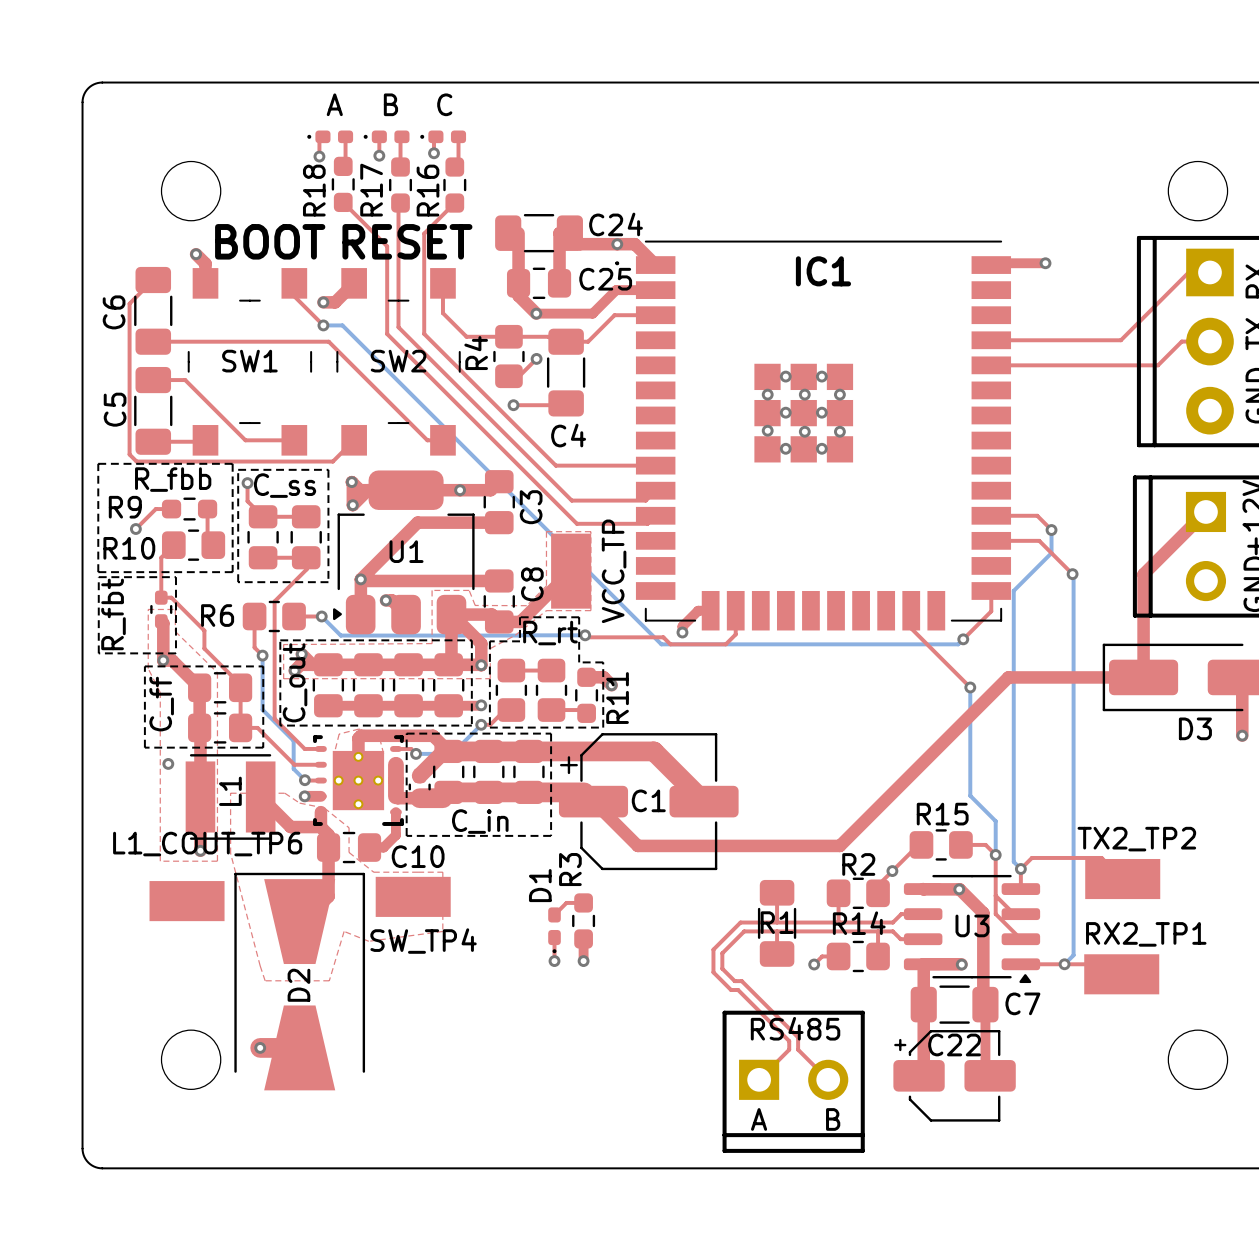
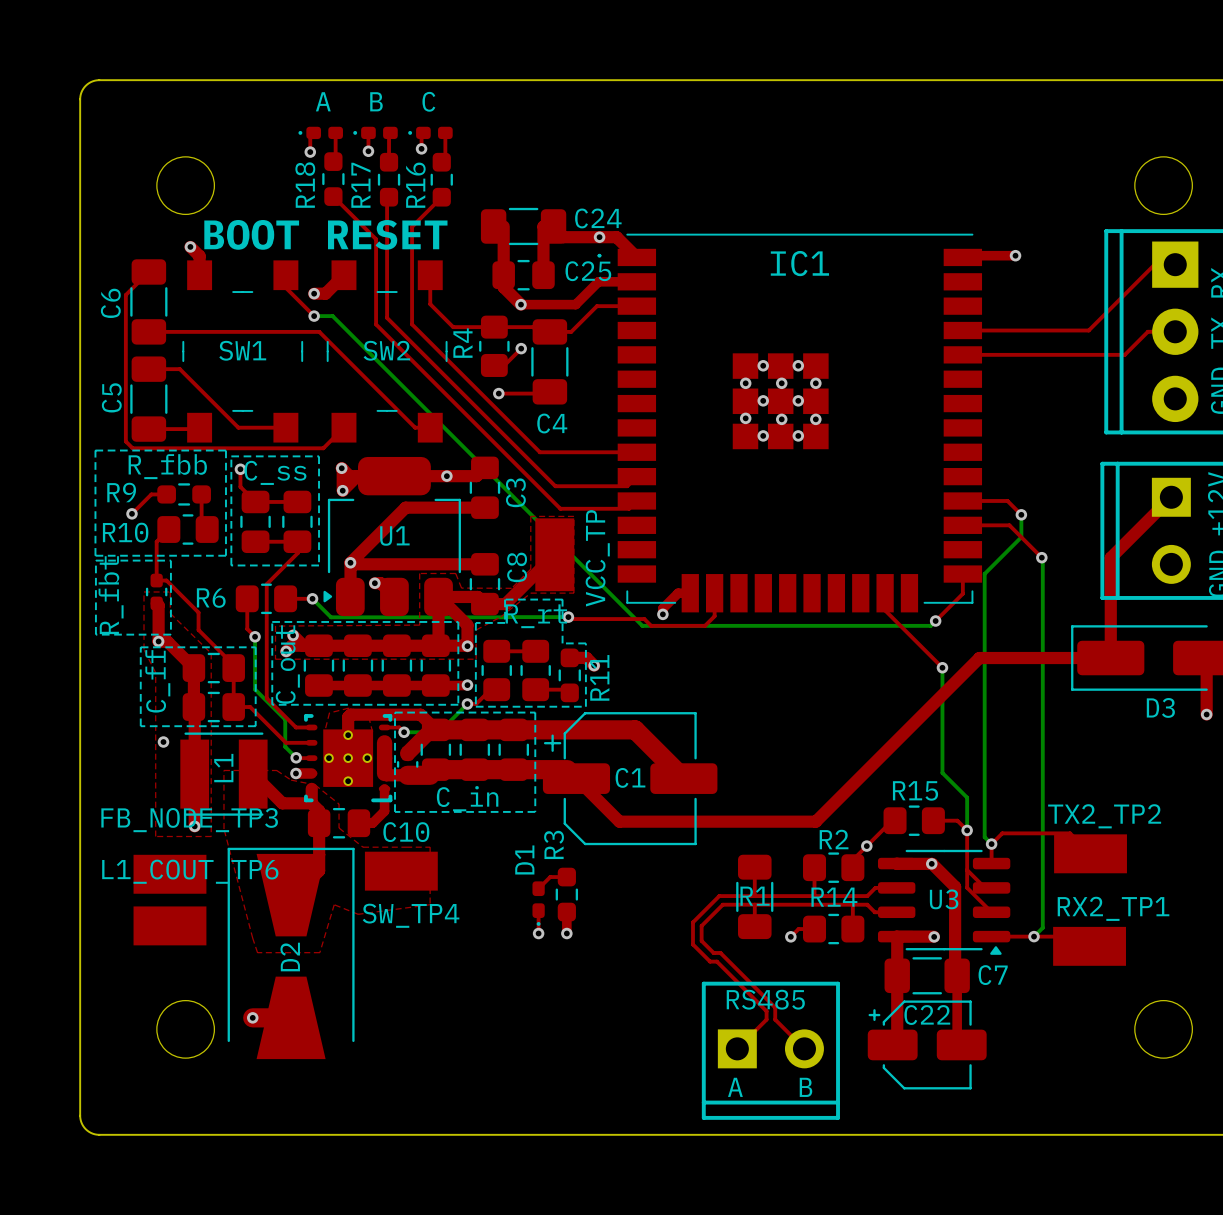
FB_NODE_TP3: none -> (169, 874)
L1_COUT_TP6 position: (187, 901) -> (169, 925)

